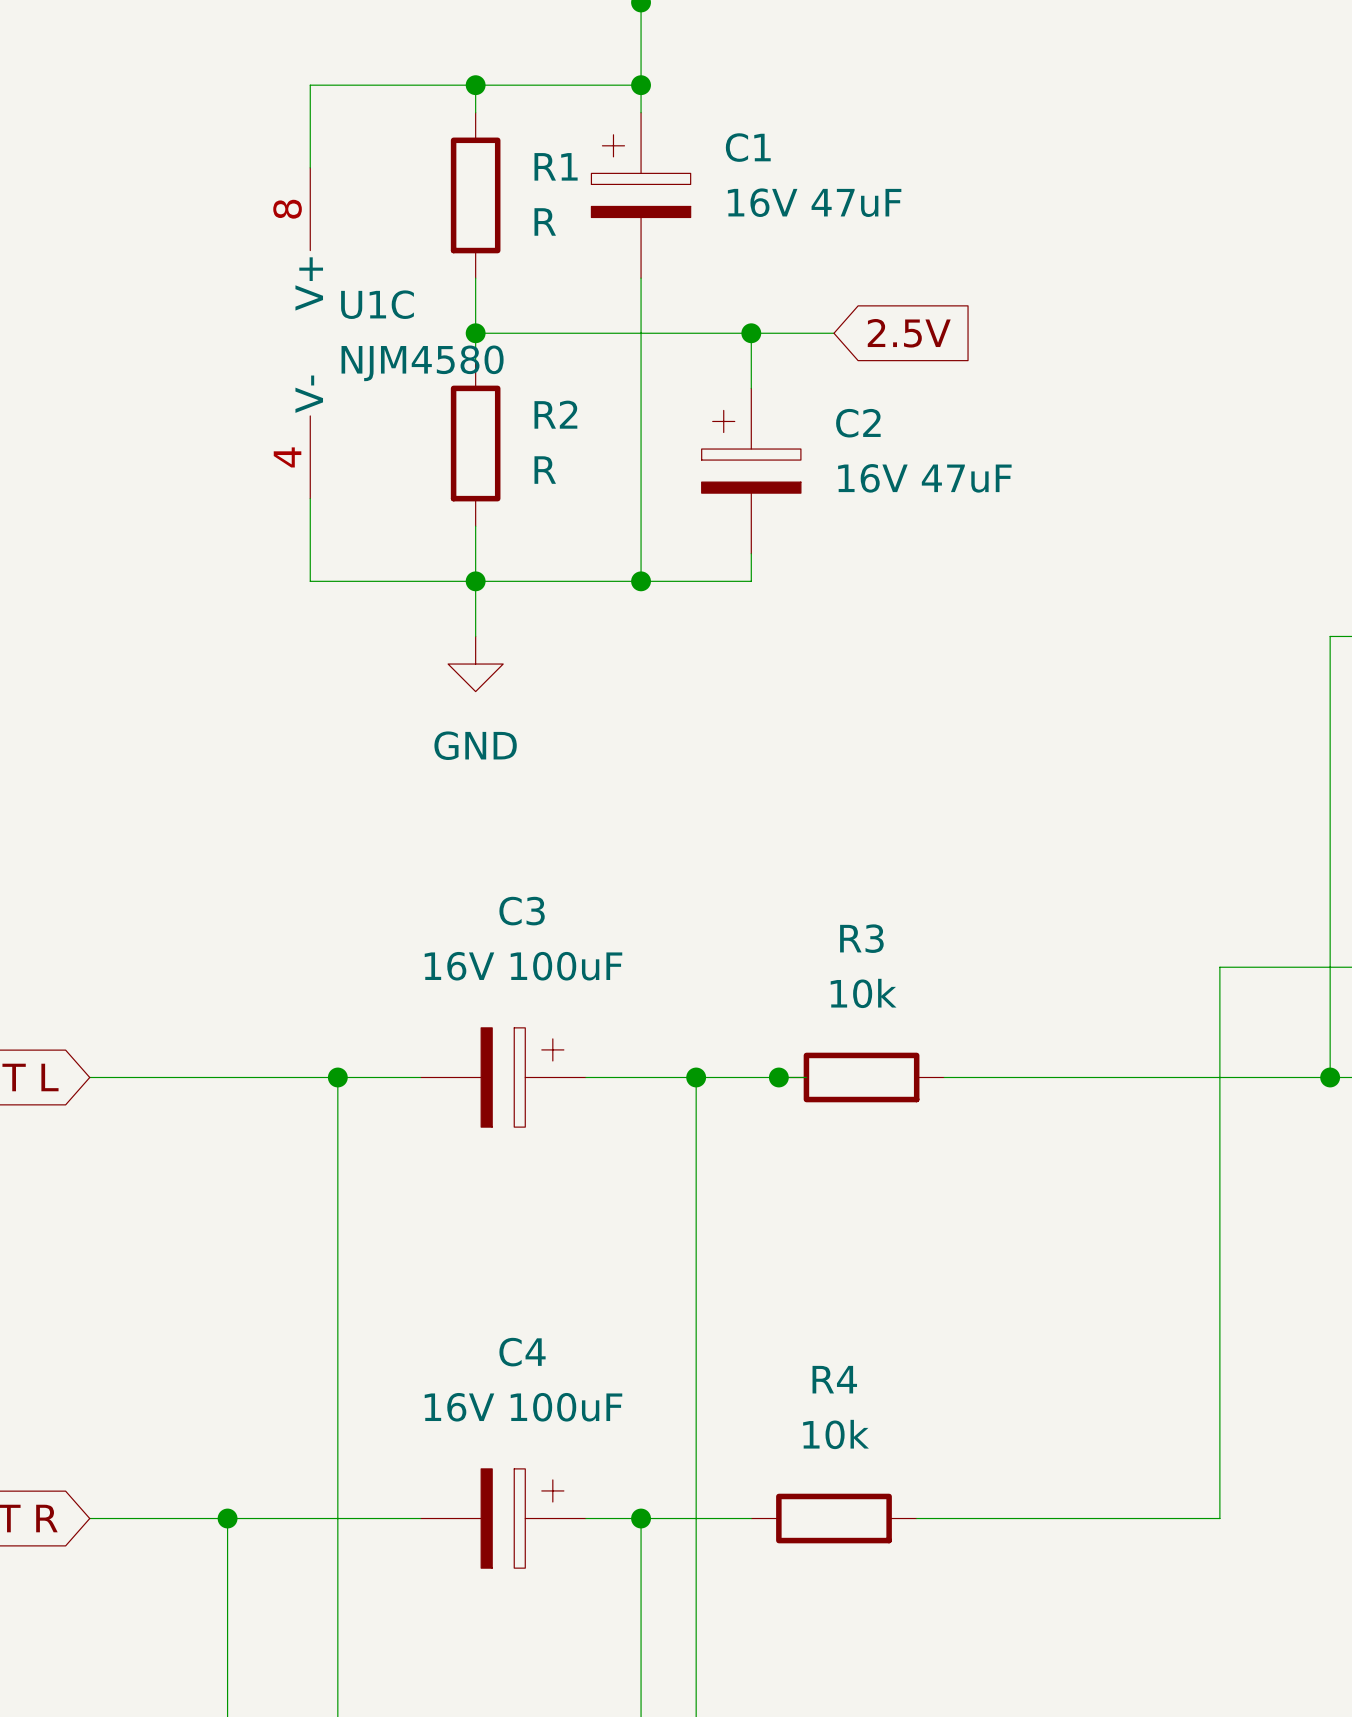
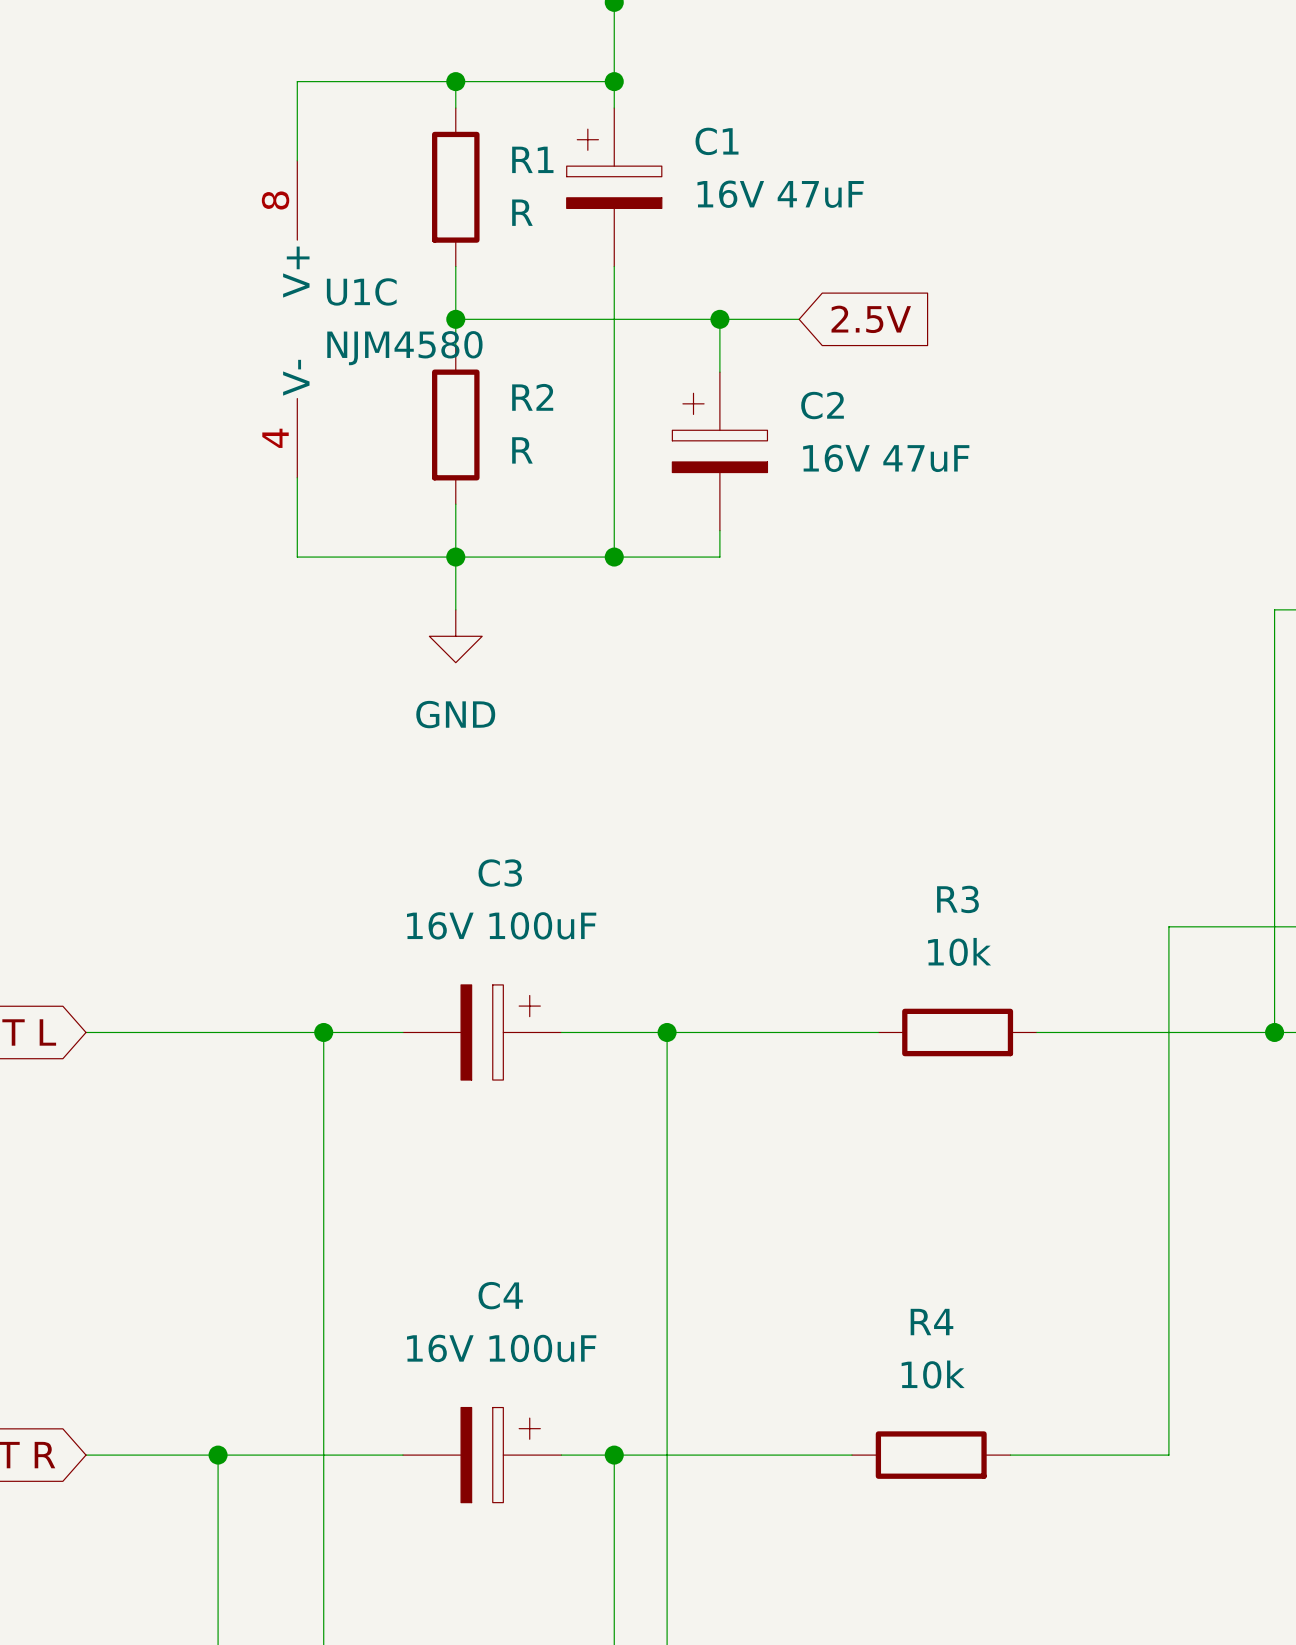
junction: (778, 1077) -> none
wire: none -> (772, 1032) (878, 1032)
R3 position: (861, 1077) -> (957, 1032)
wire: (944, 1077) (1082, 1077) -> none
R4 position: (833, 1518) -> (931, 1455)
wire: (916, 1518) (1054, 1518) -> (719, 1455) (851, 1455)

